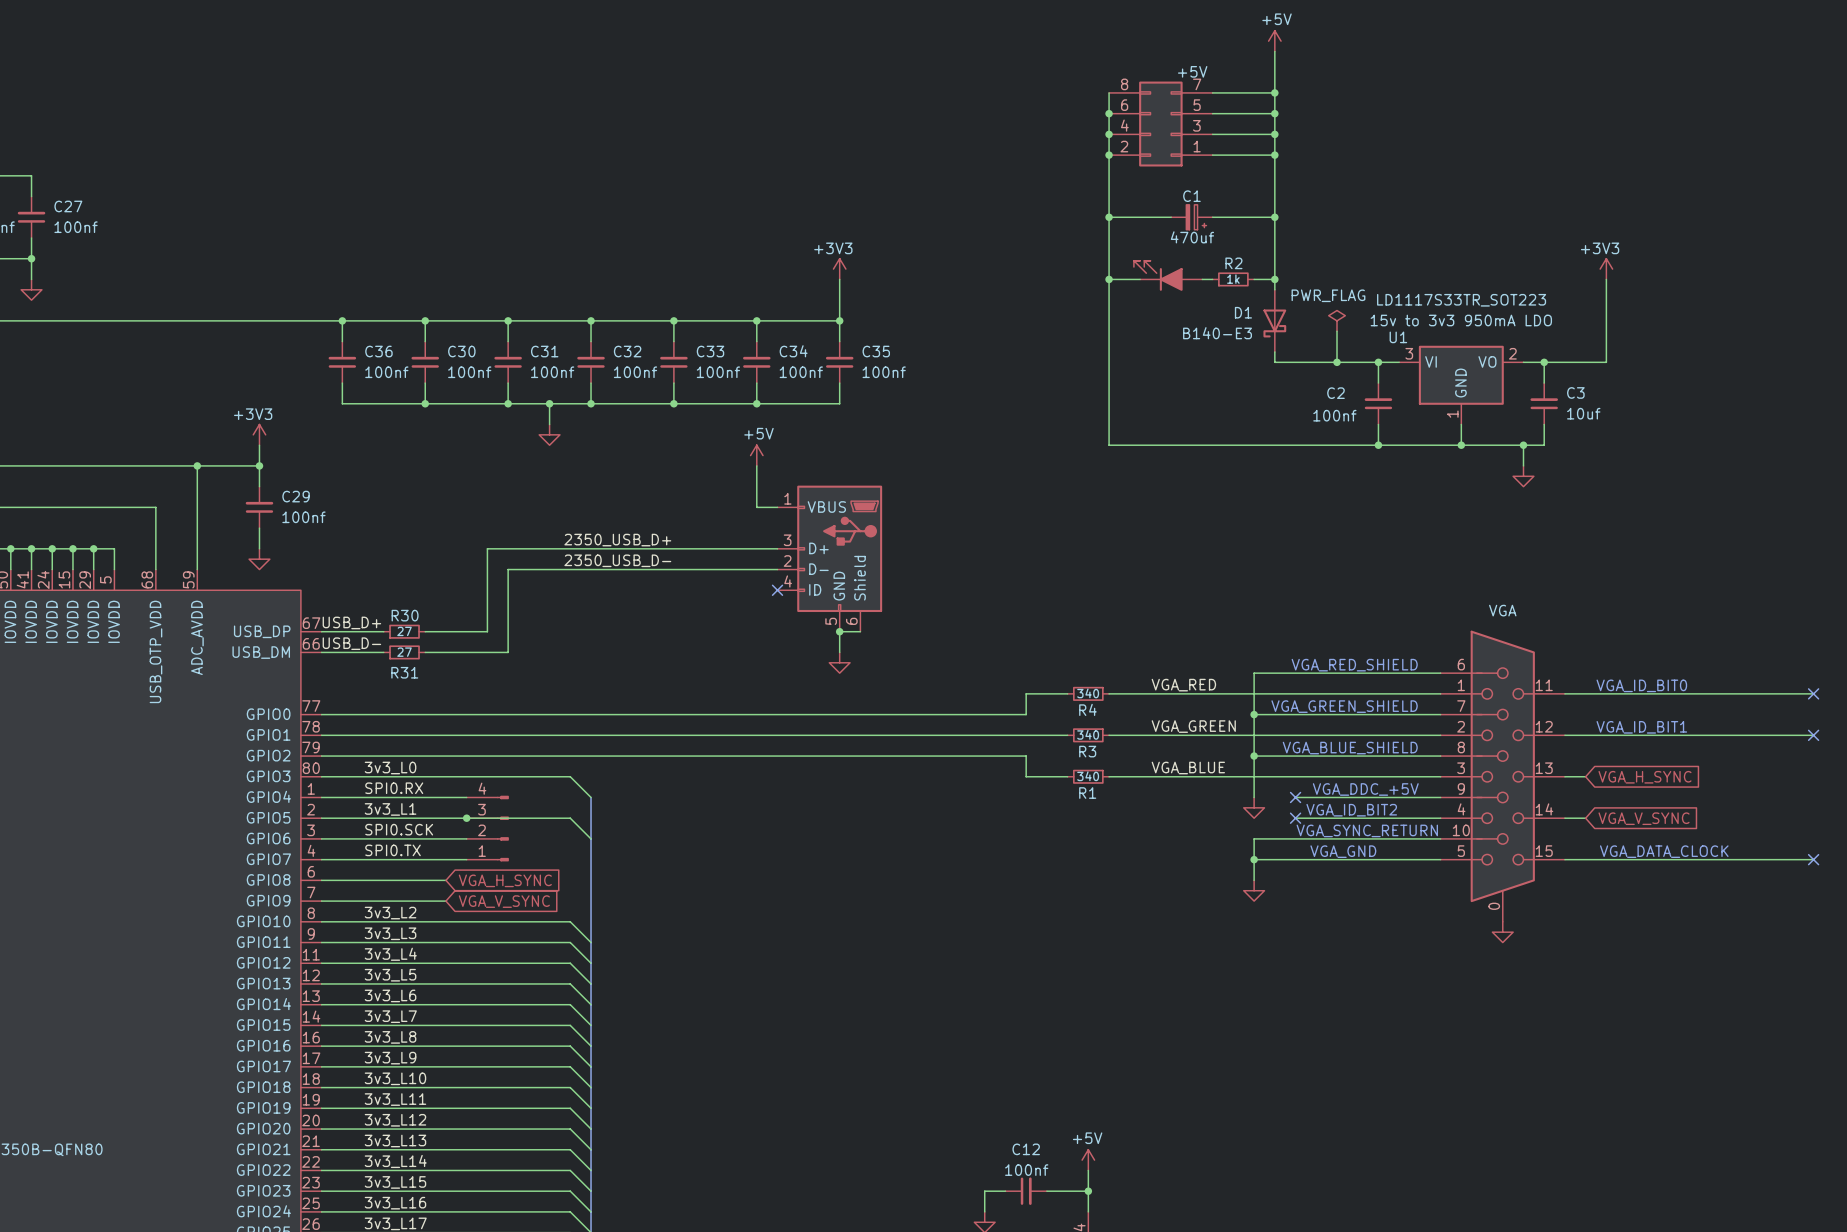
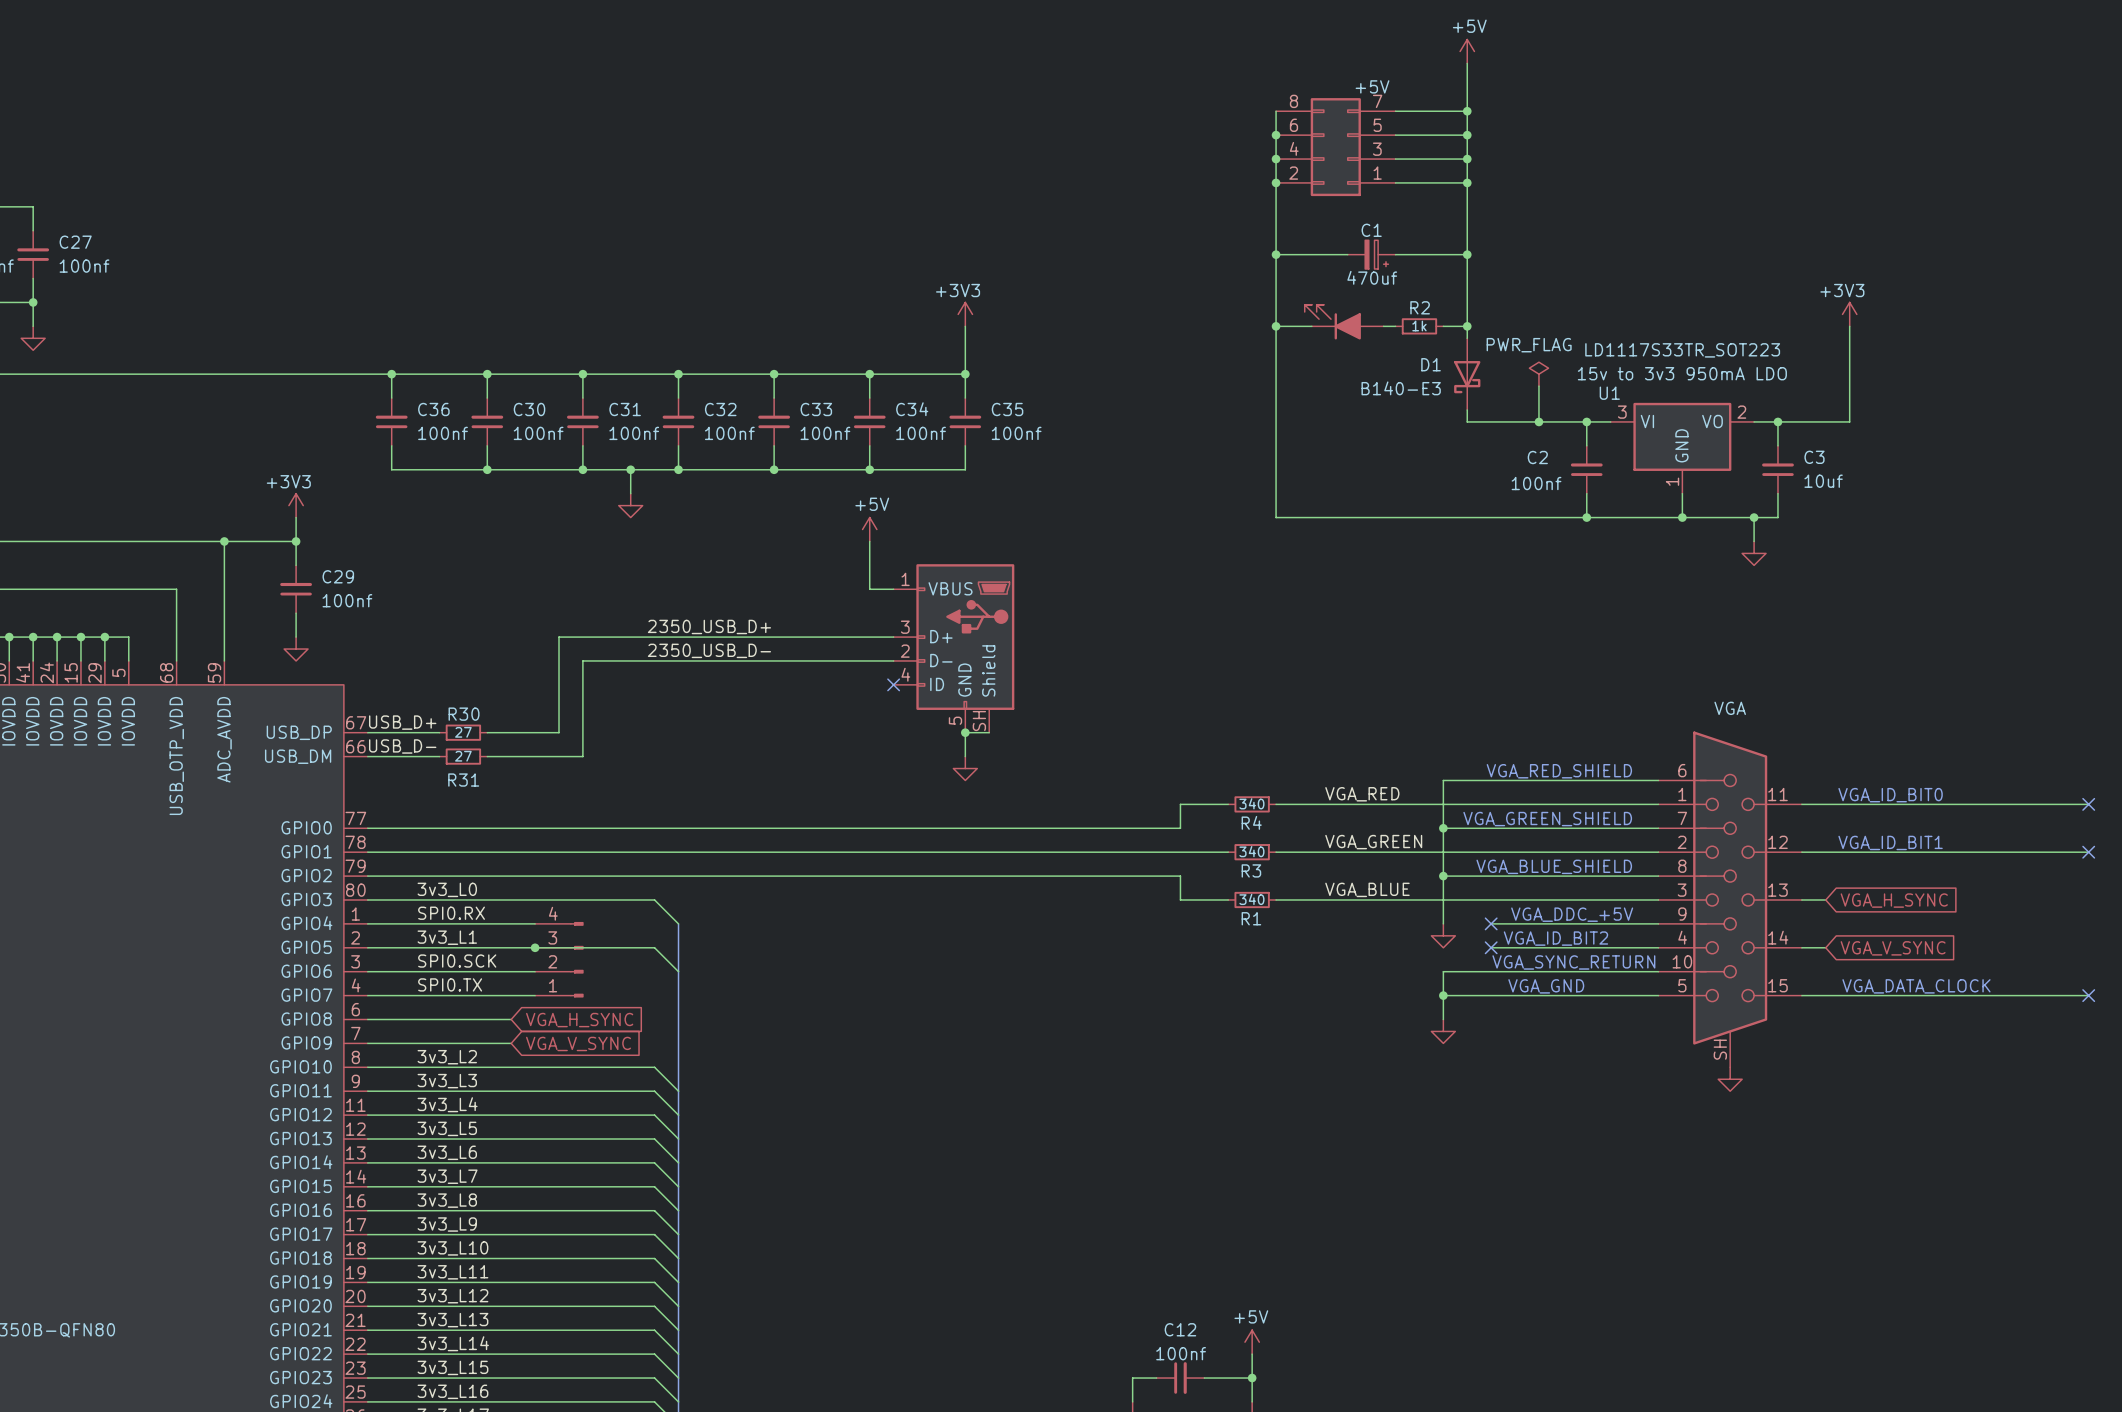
part pin number: 6 (851, 621) -> SH (979, 721)
part pin number: 0 (1494, 906) -> SH (1720, 1049)

